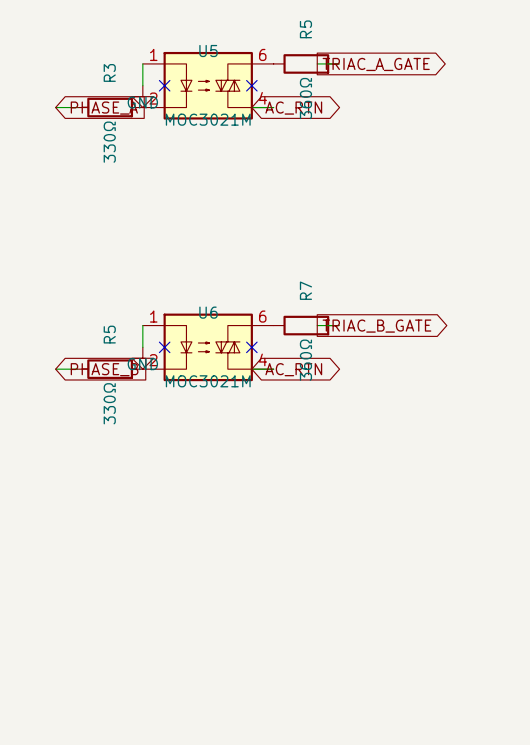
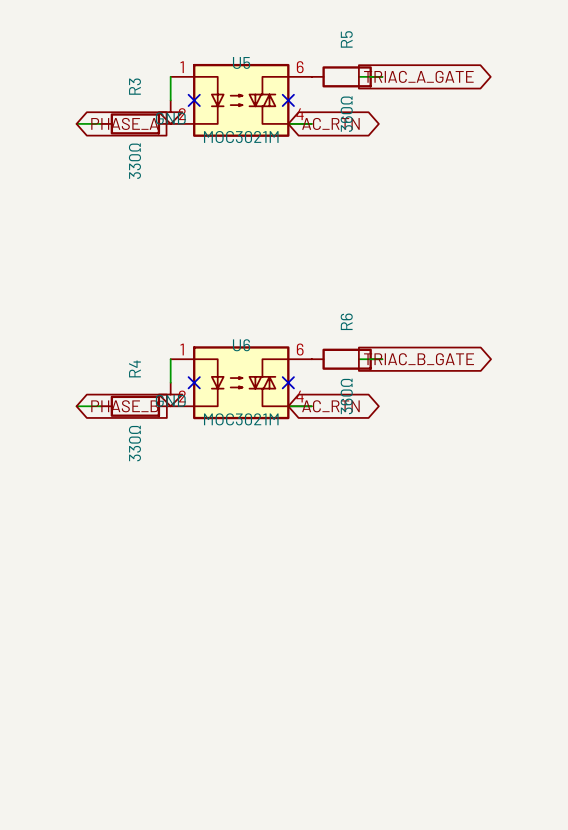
R7 name: R7 (305, 290) -> R6 (346, 321)
R5 name: R5 (109, 334) -> R4 (134, 368)

